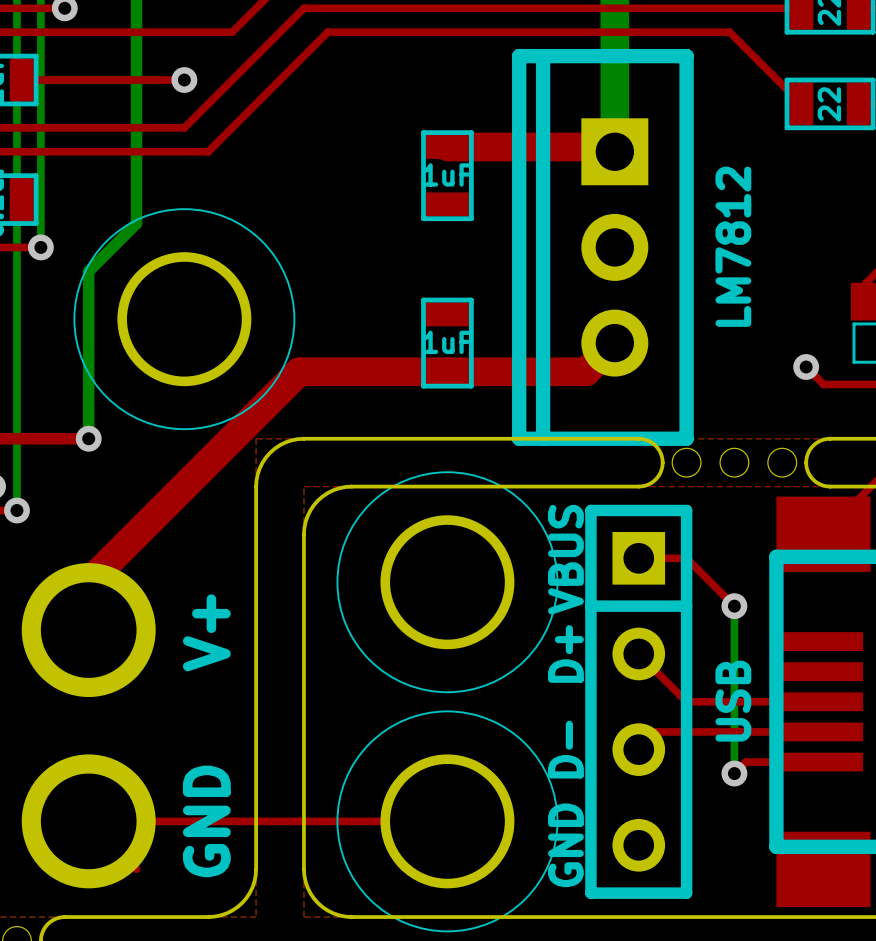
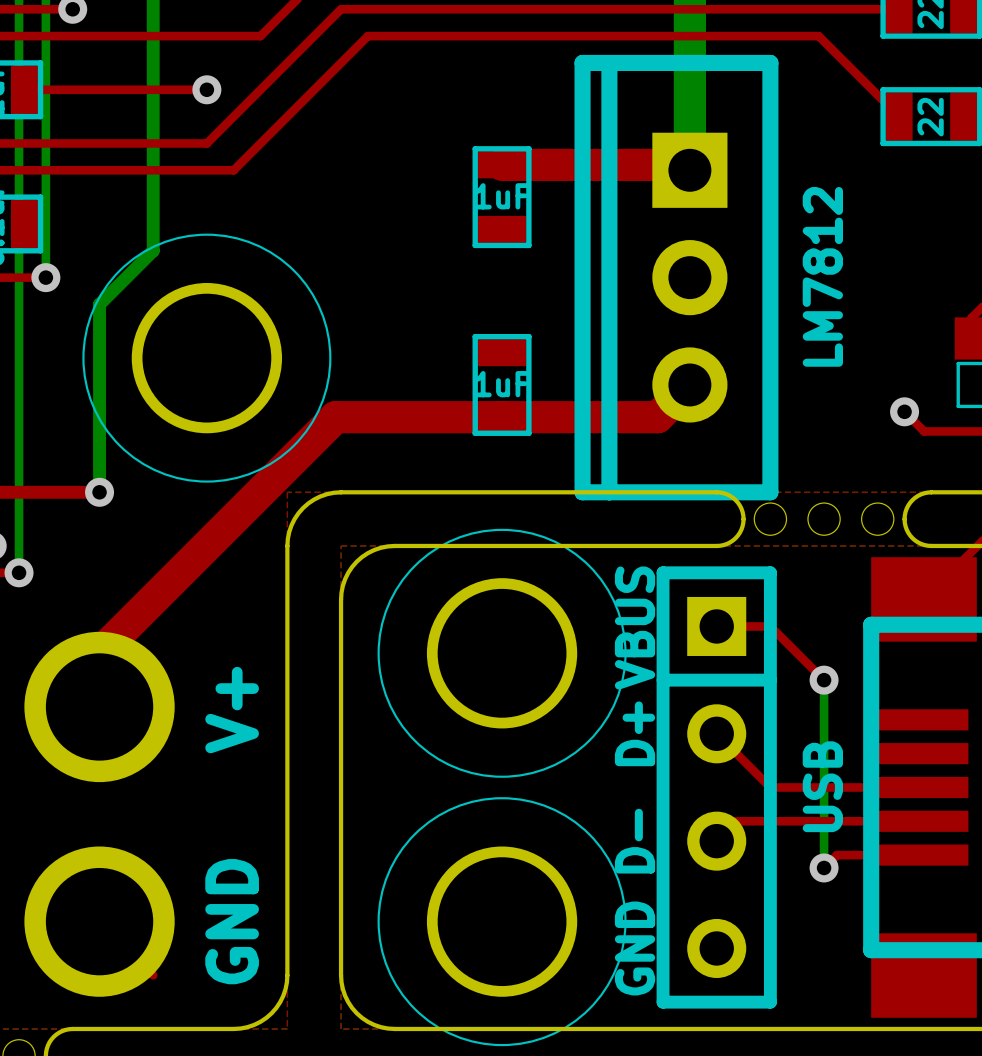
top track: (88, 821) (447, 821) -> none

